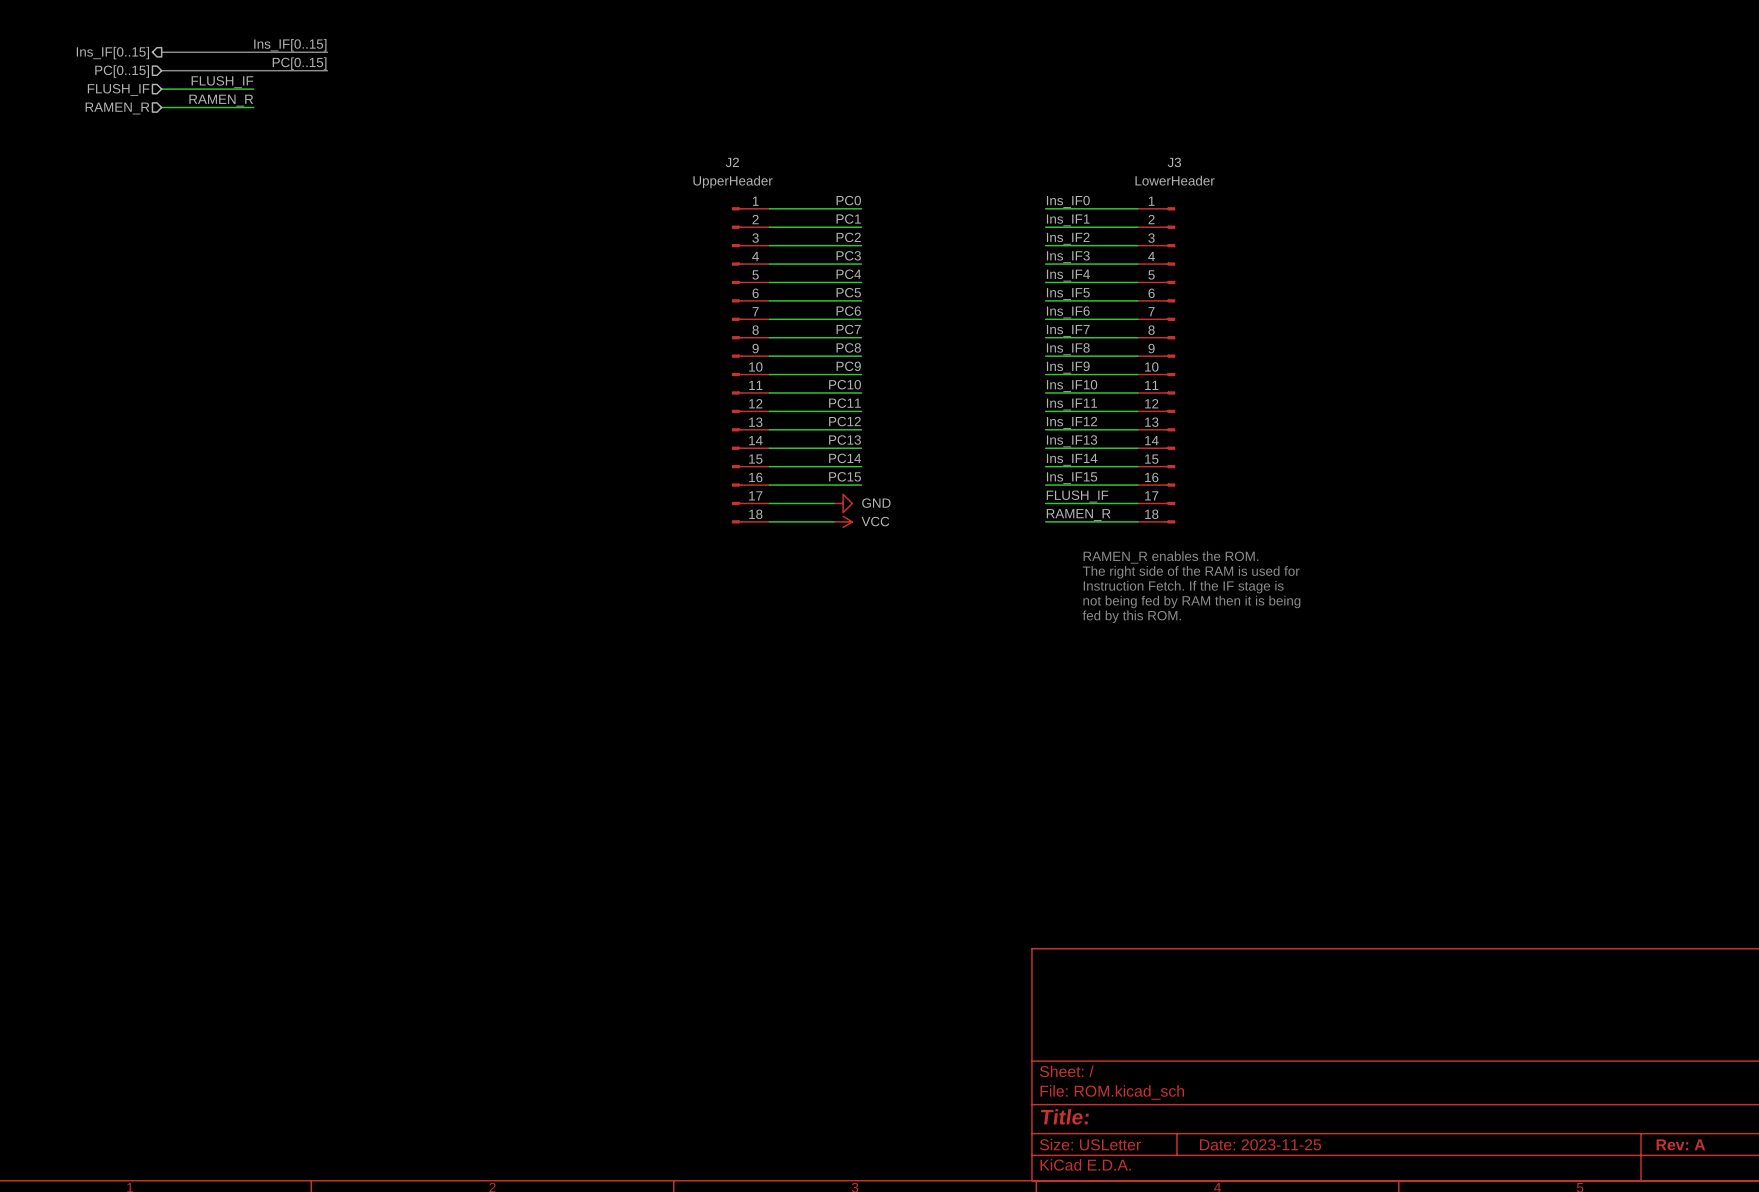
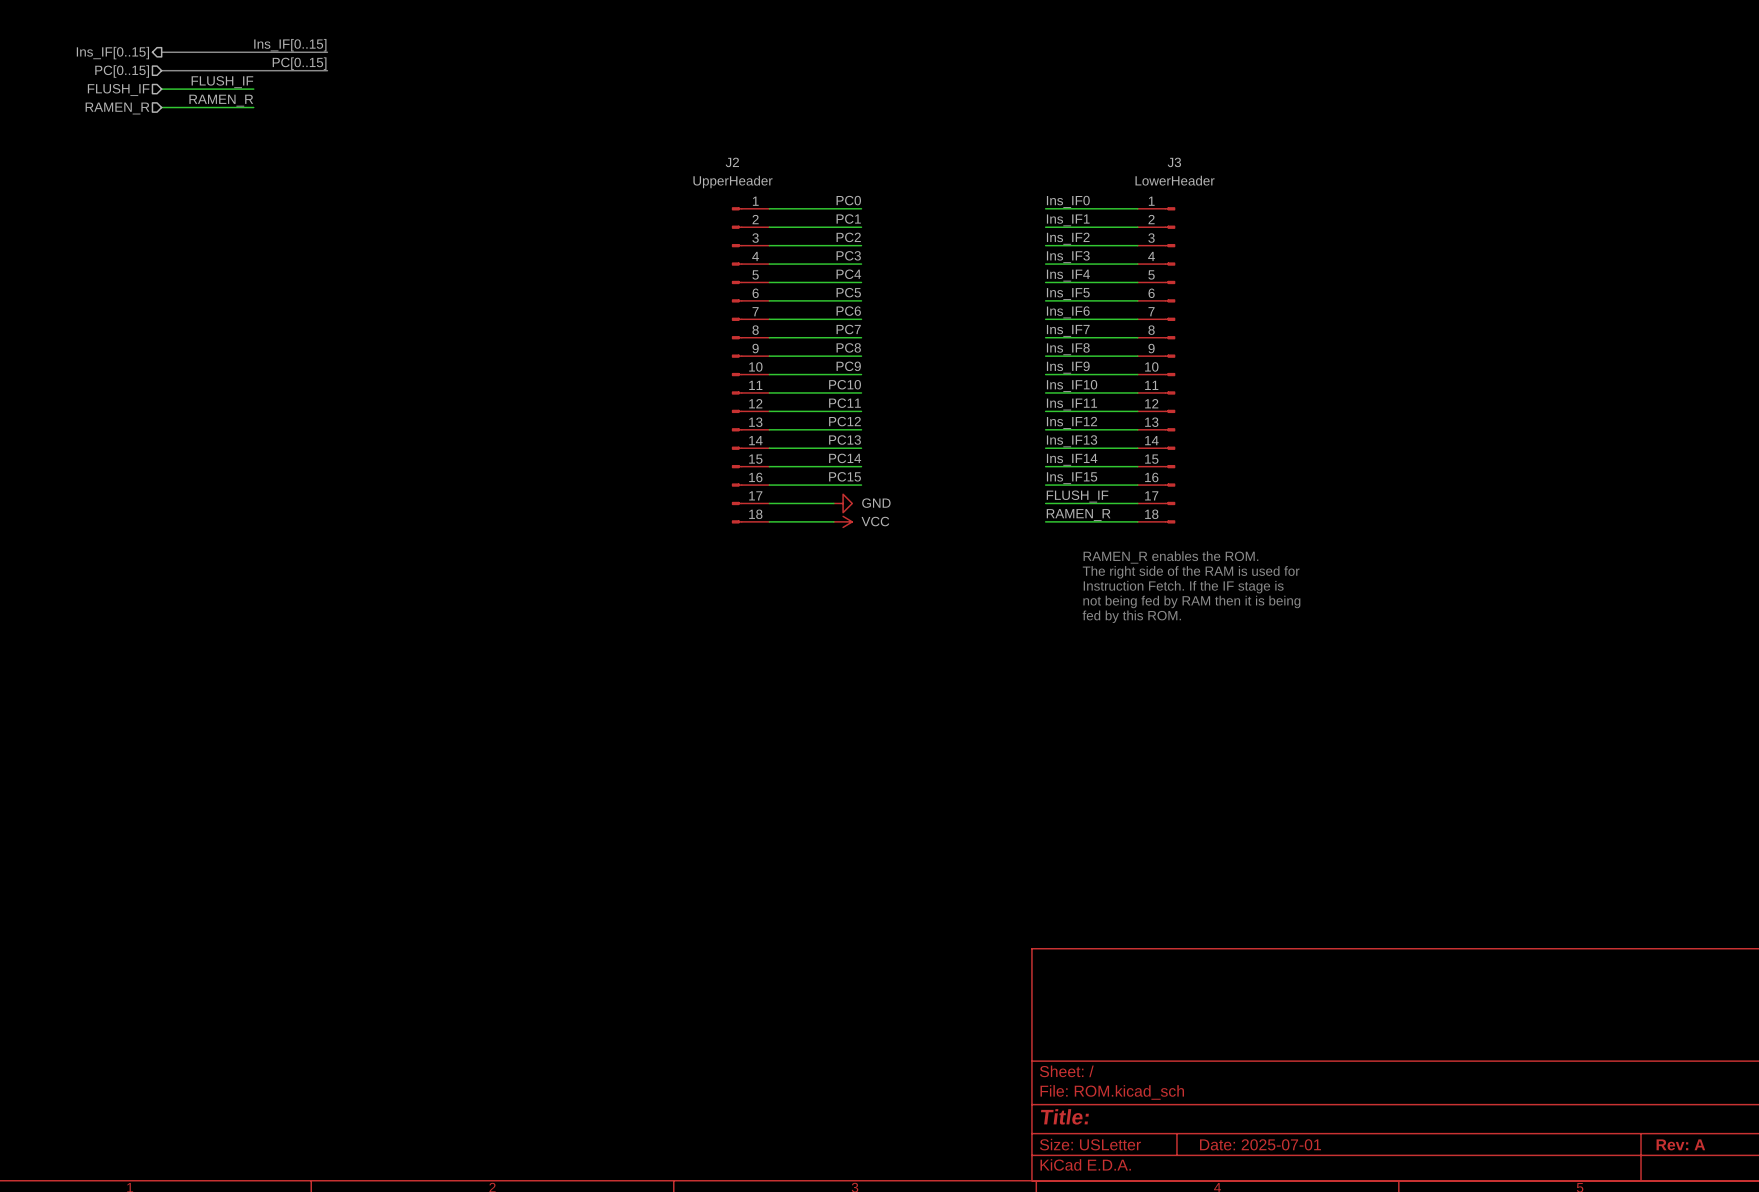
title block: Date: 2023-11-25 (1260, 1144) -> Date: 2025-07-01 (1260, 1144)

